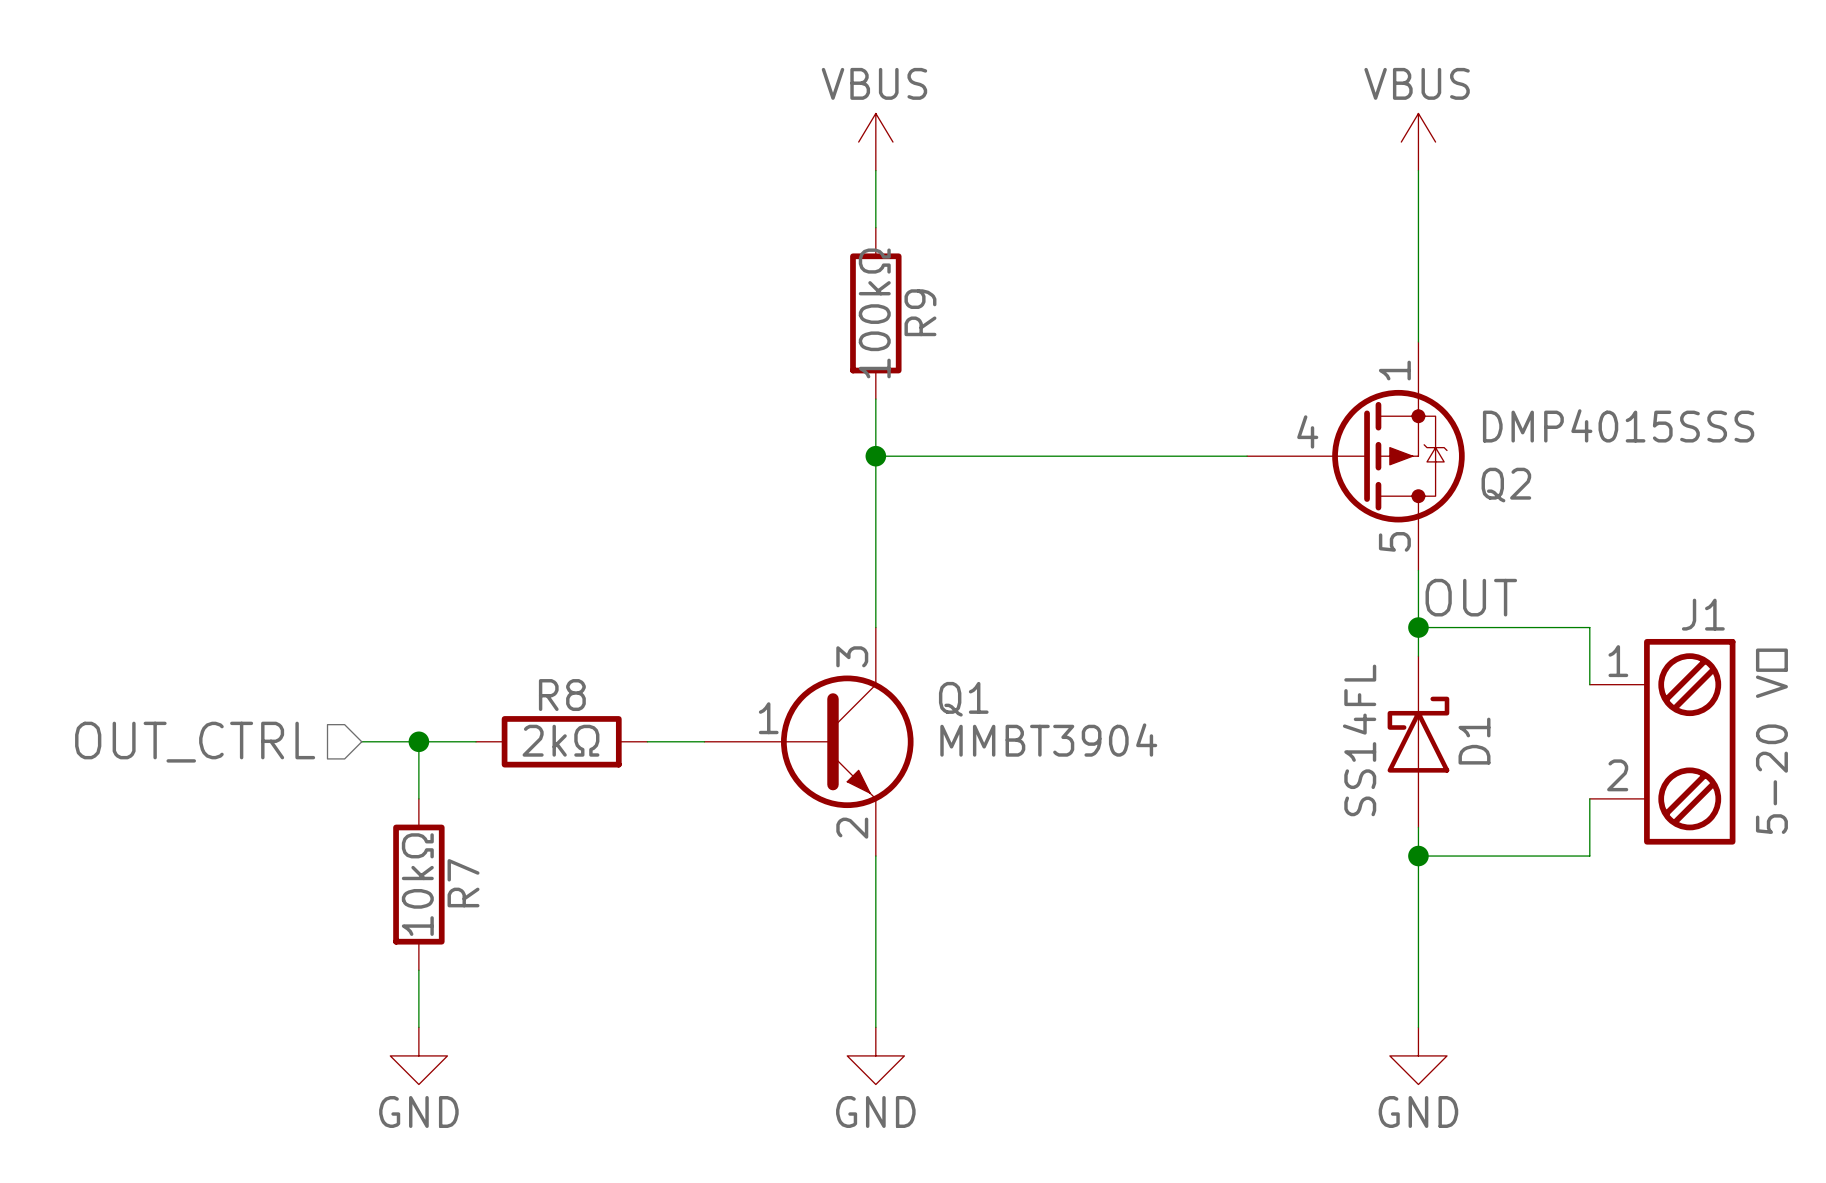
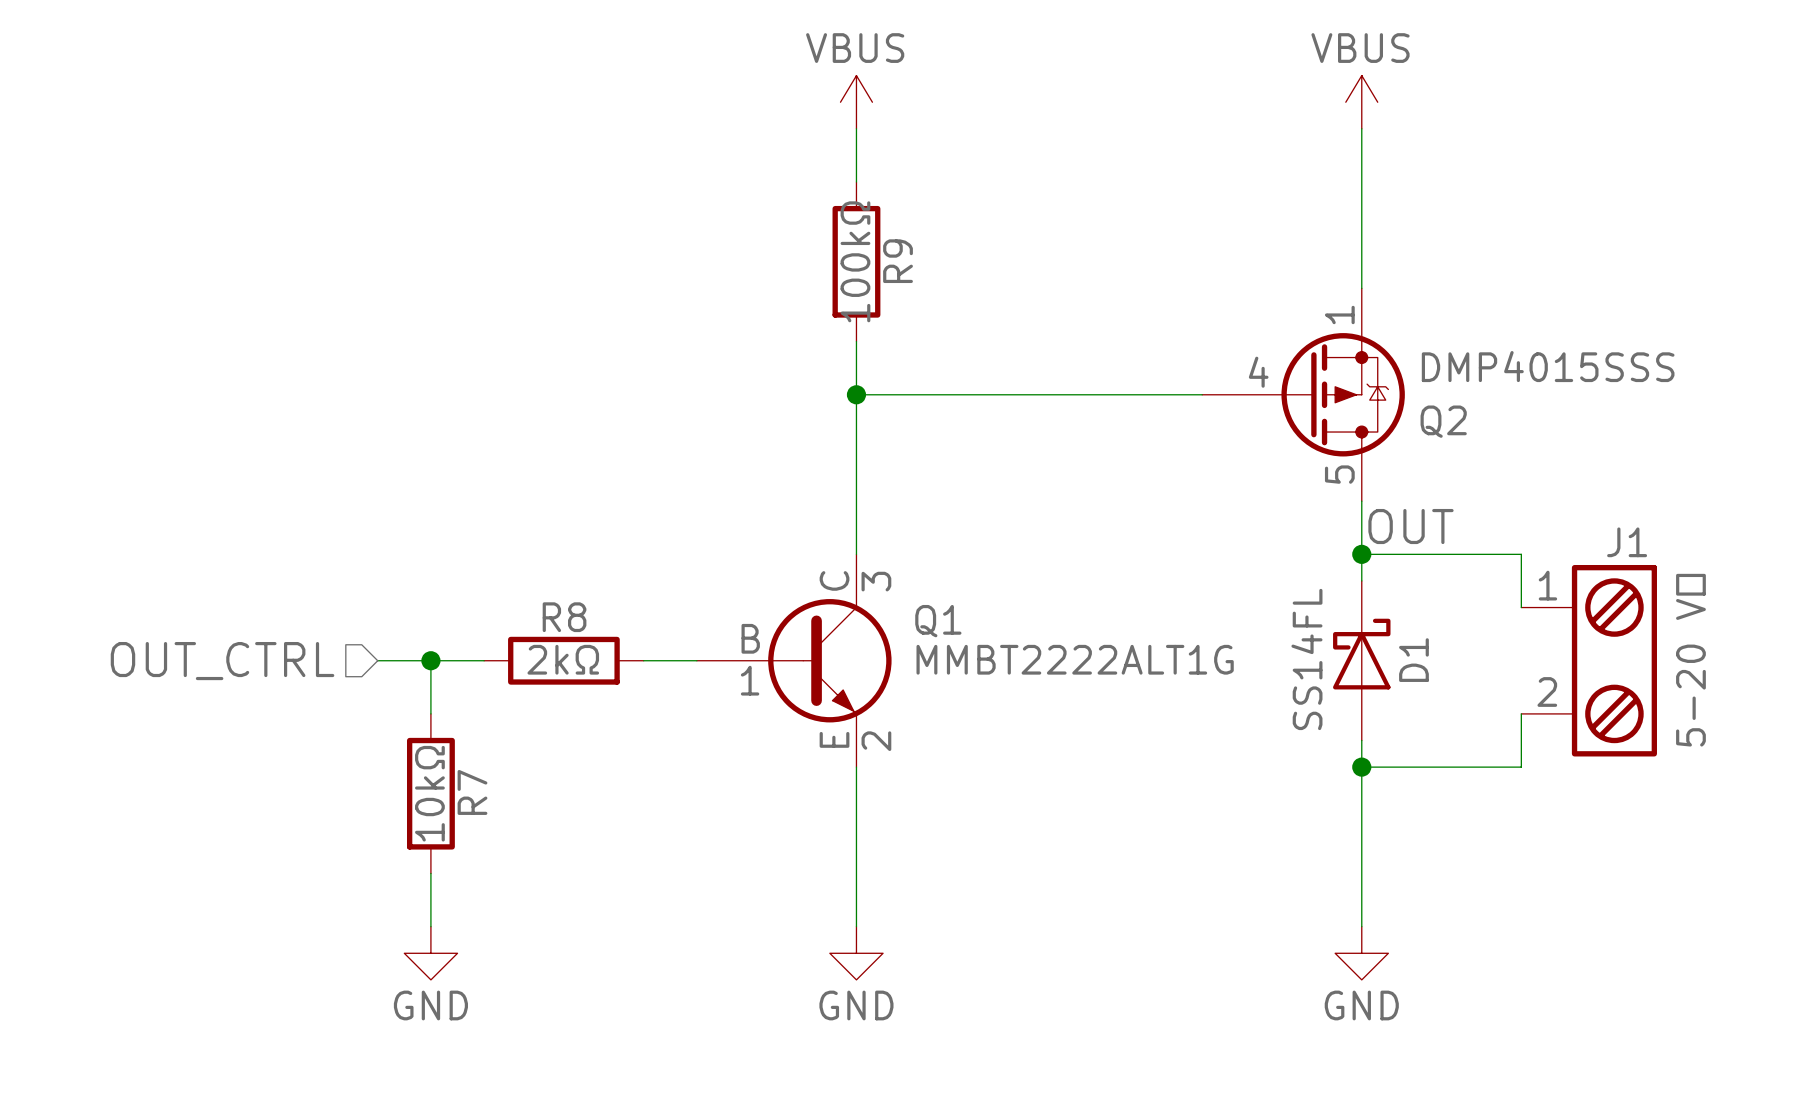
Q1 symbol: [704, 627, 914, 857] -> [696, 554, 892, 768]
Q1 value: MMBT3904 (1048, 740) -> MMBT2222ALT1G (1075, 659)

